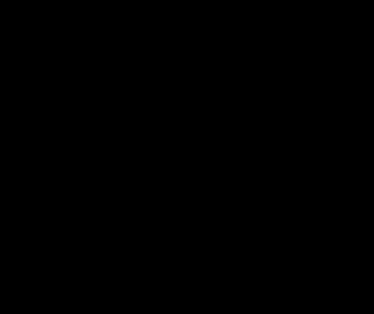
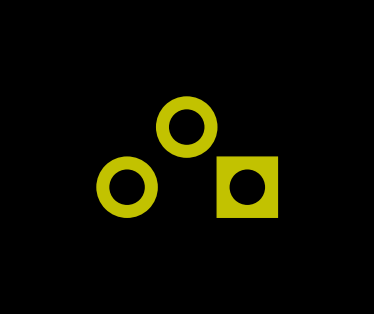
part: none -> (187, 157)

